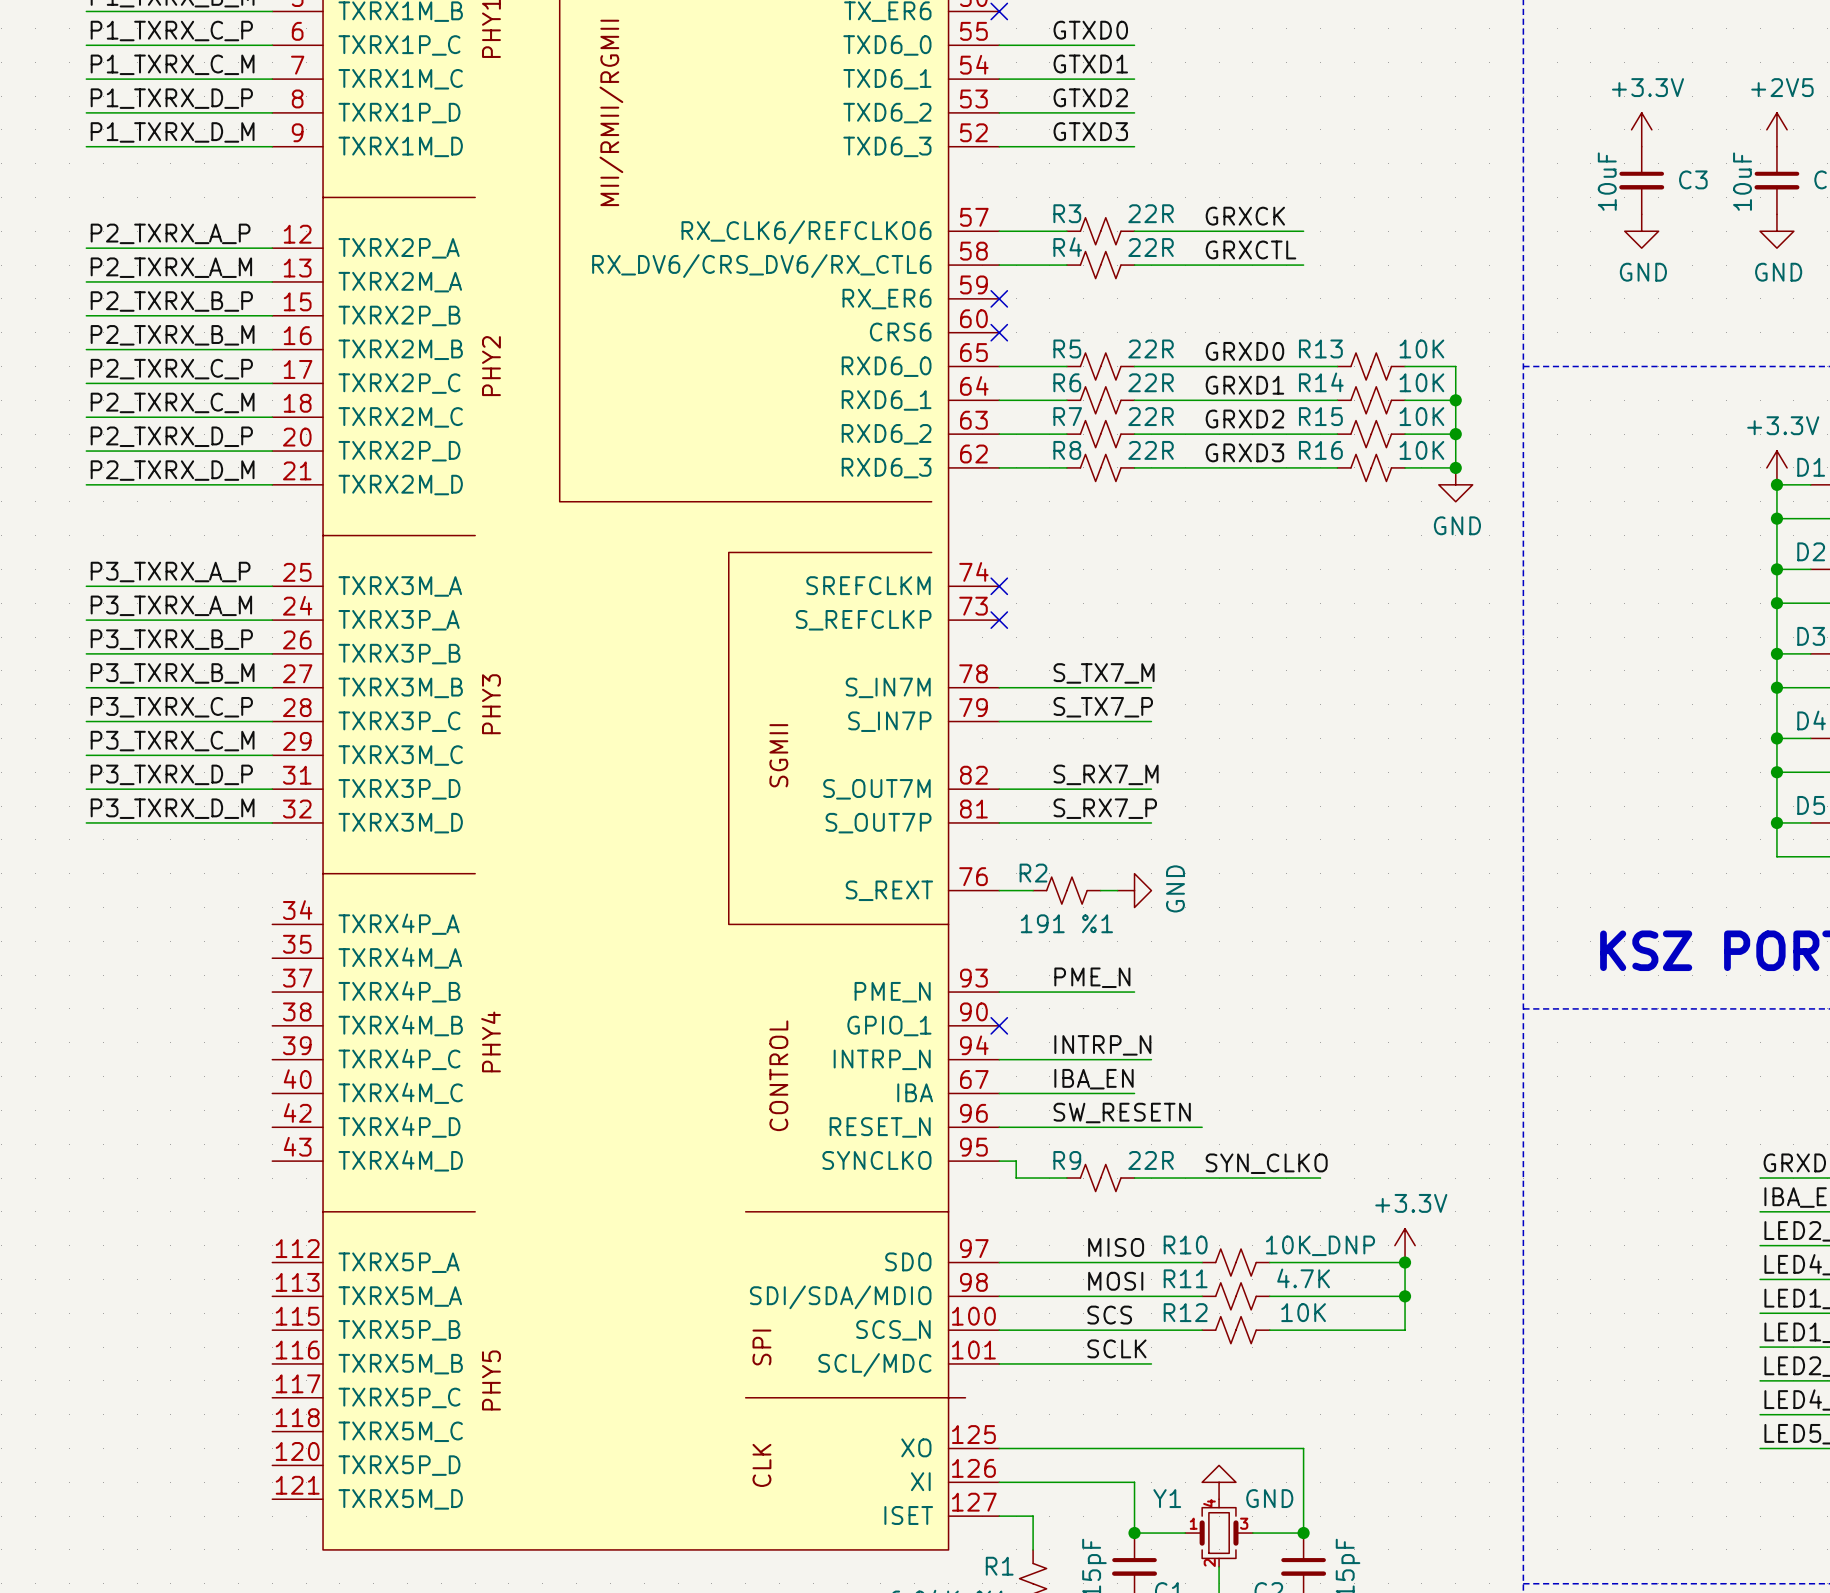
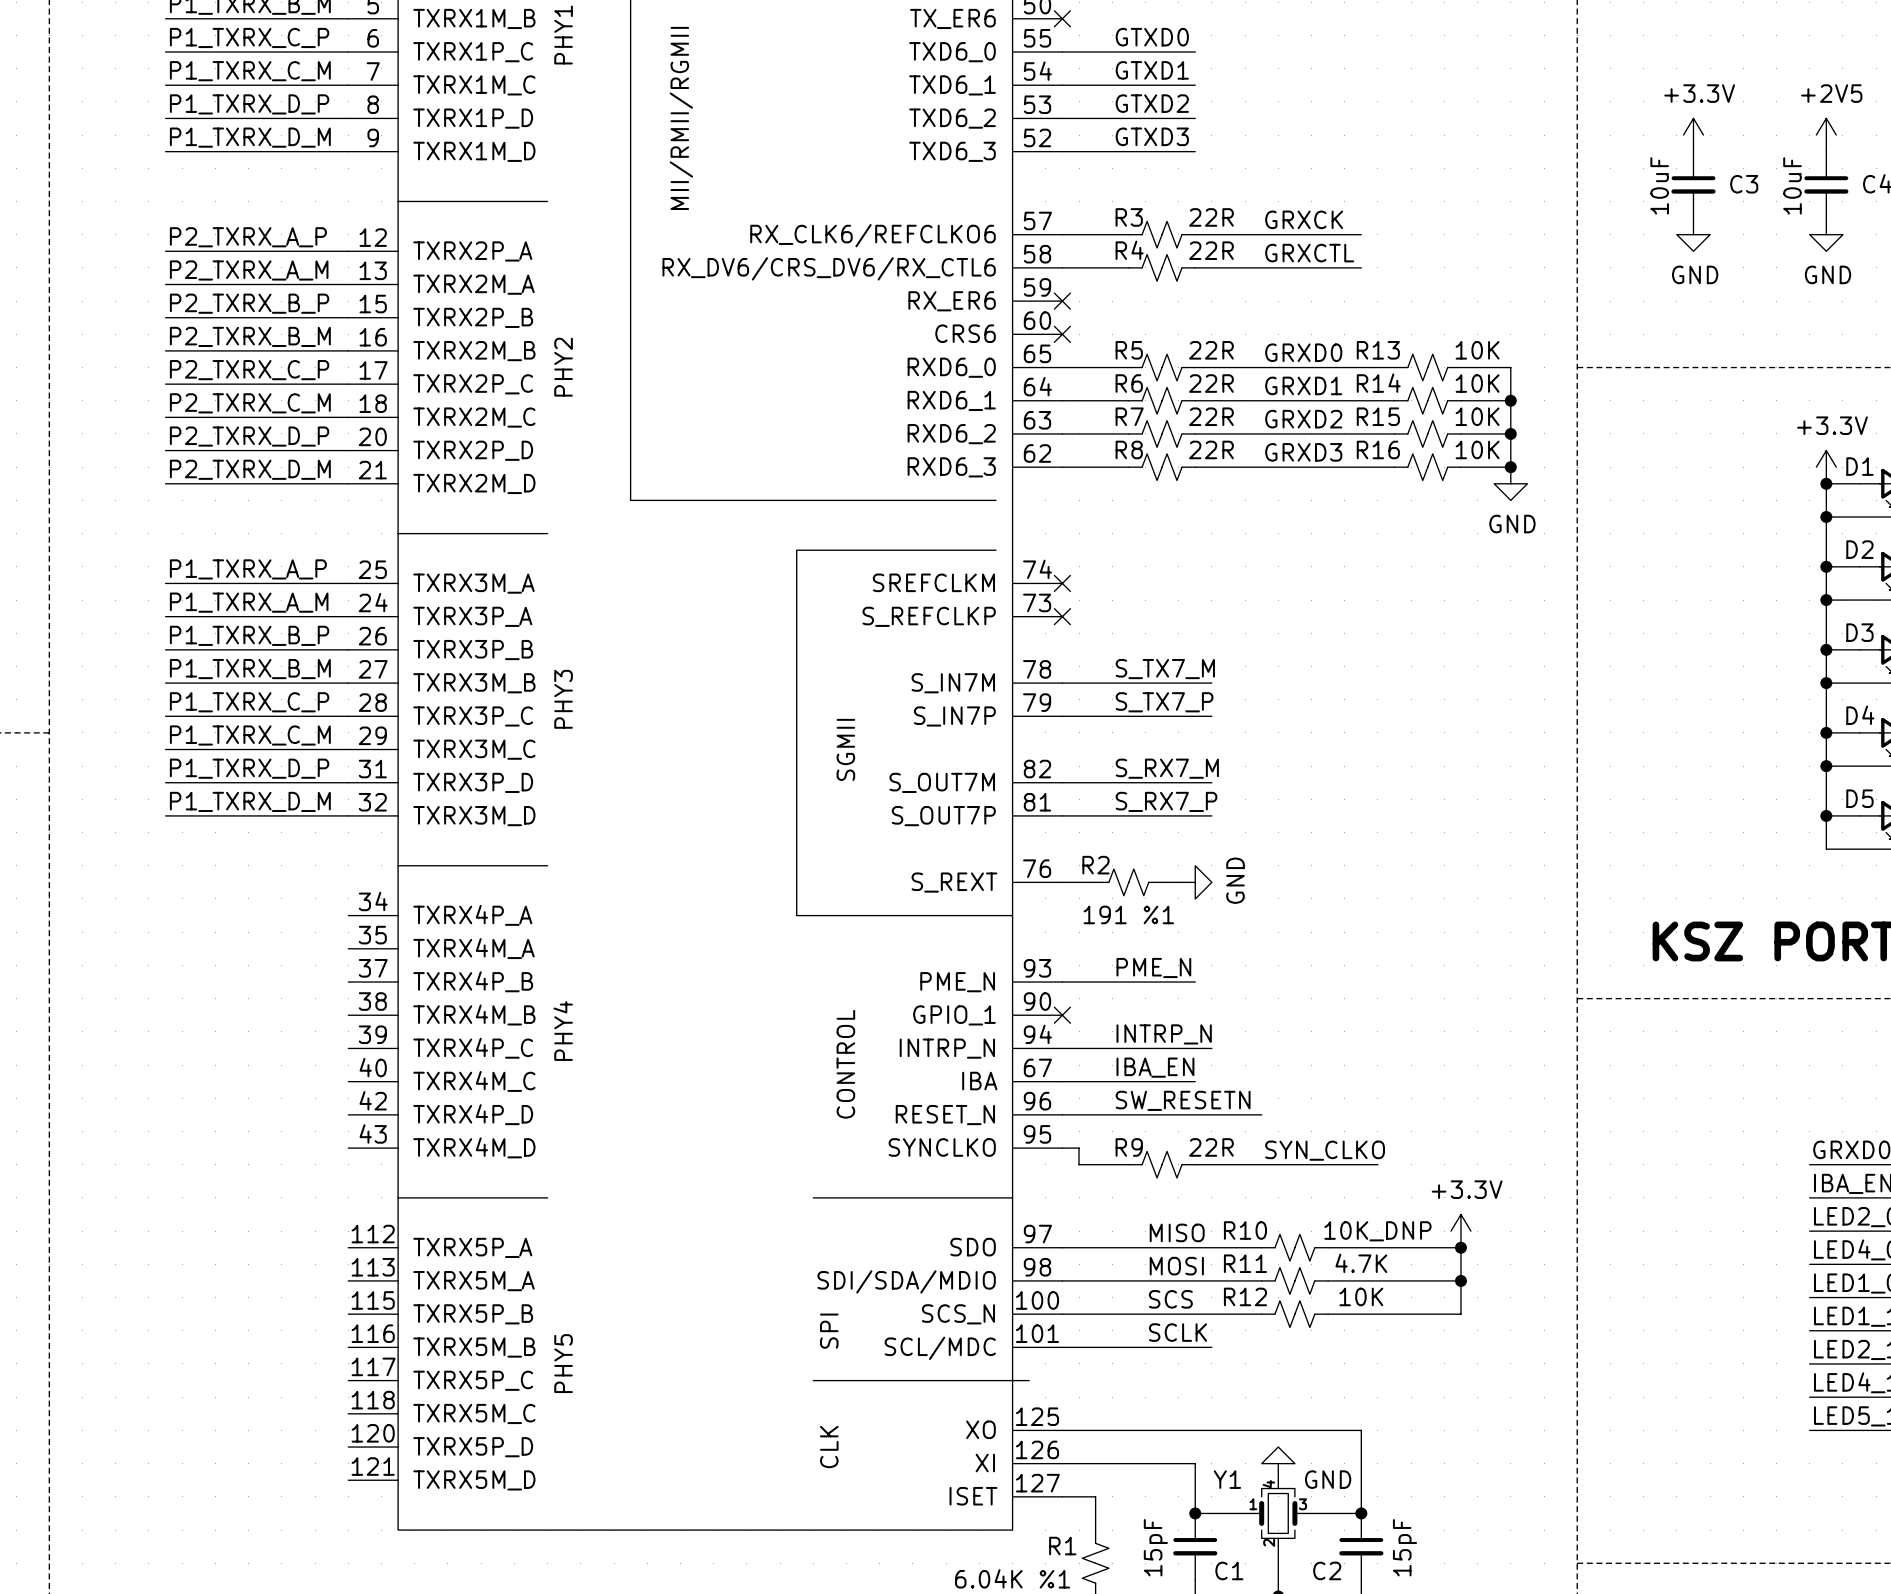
label: P3_TXRX_A_P (170, 572) -> P1_TXRX_A_P (248, 569)
label: P3_TXRX_A_M (171, 605) -> P1_TXRX_A_M (249, 602)
label: P3_TXRX_B_P (171, 639) -> P1_TXRX_B_P (249, 635)
label: P3_TXRX_B_M (172, 673) -> P1_TXRX_B_M (250, 669)
label: P3_TXRX_C_P (171, 707) -> P1_TXRX_C_P (249, 702)
label: P3_TXRX_C_M (172, 741) -> P1_TXRX_C_M (250, 735)
label: P3_TXRX_D_P (171, 774) -> P1_TXRX_D_P (249, 768)
label: P3_TXRX_D_M (172, 808) -> P1_TXRX_D_M (250, 801)

